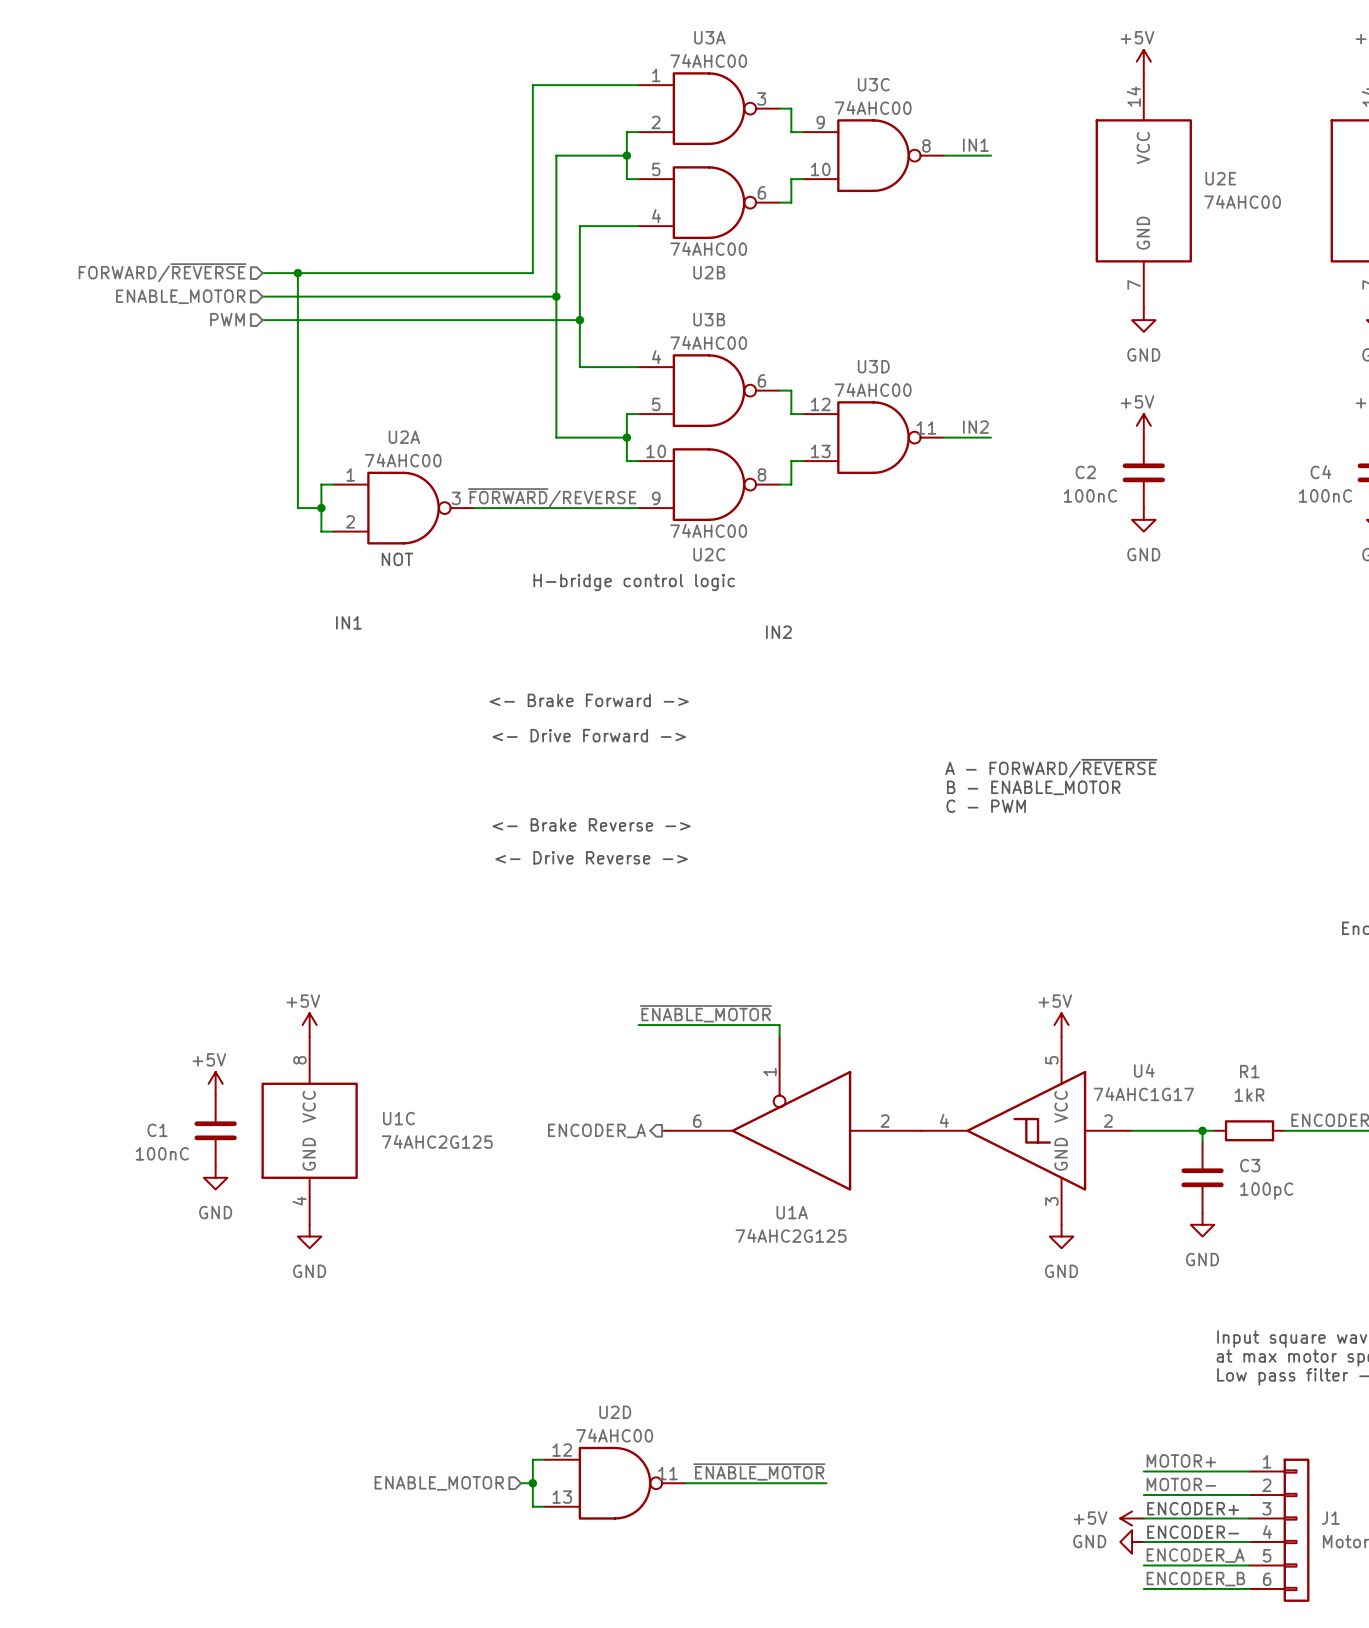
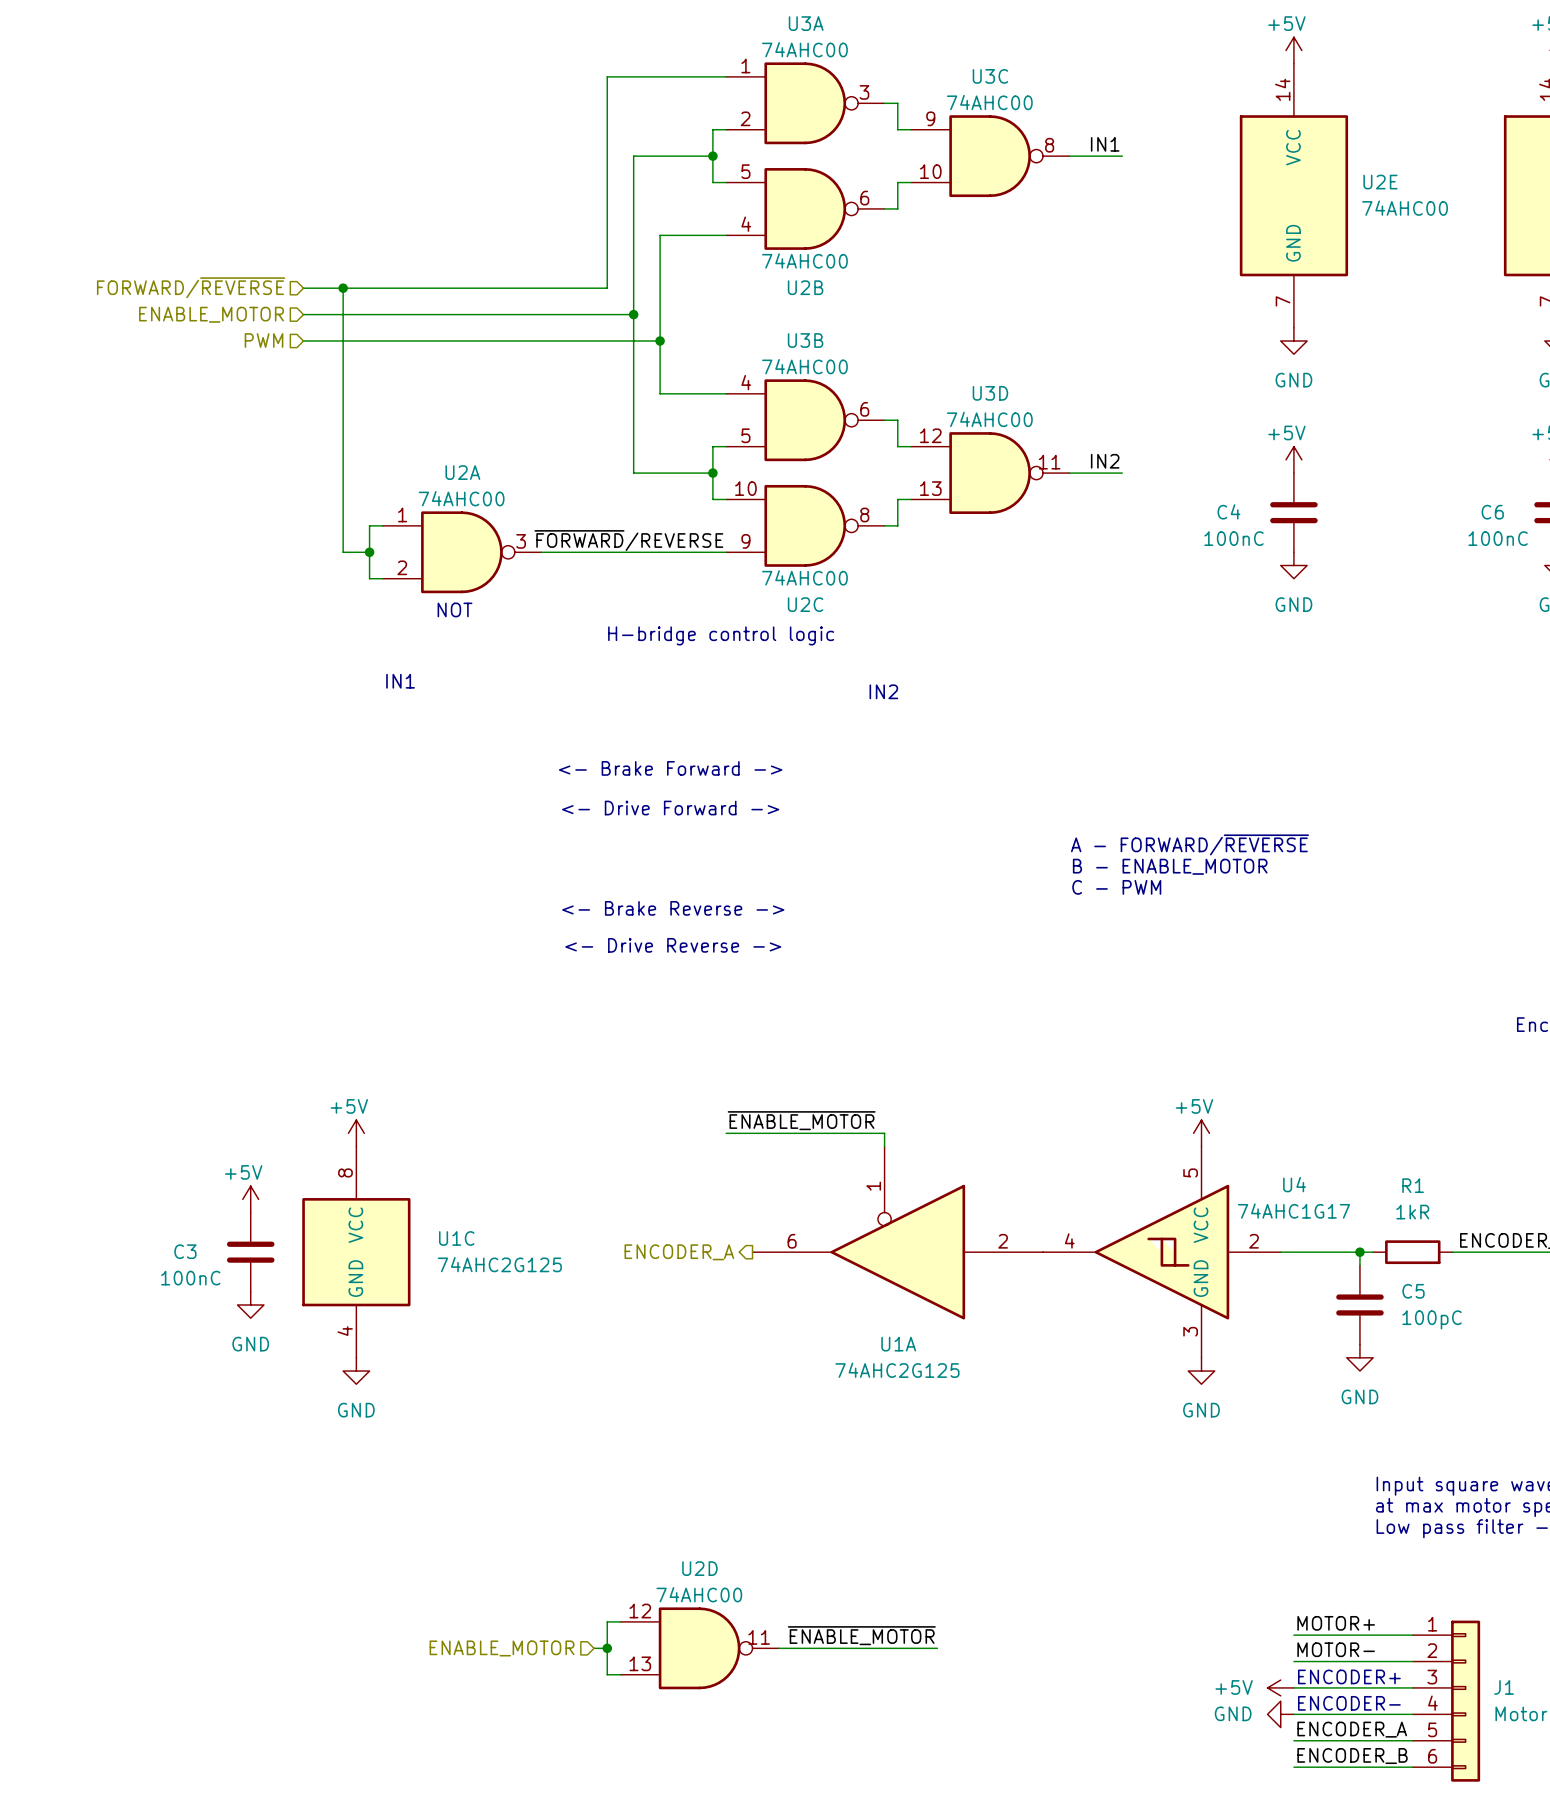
C2 name: C2 (1085, 472) -> C4 (1228, 511)
C4 name: C4 (1320, 472) -> C6 (1492, 512)
C1 name: C1 (157, 1130) -> C3 (185, 1251)
C3 name: C3 (1250, 1165) -> C5 (1413, 1291)

